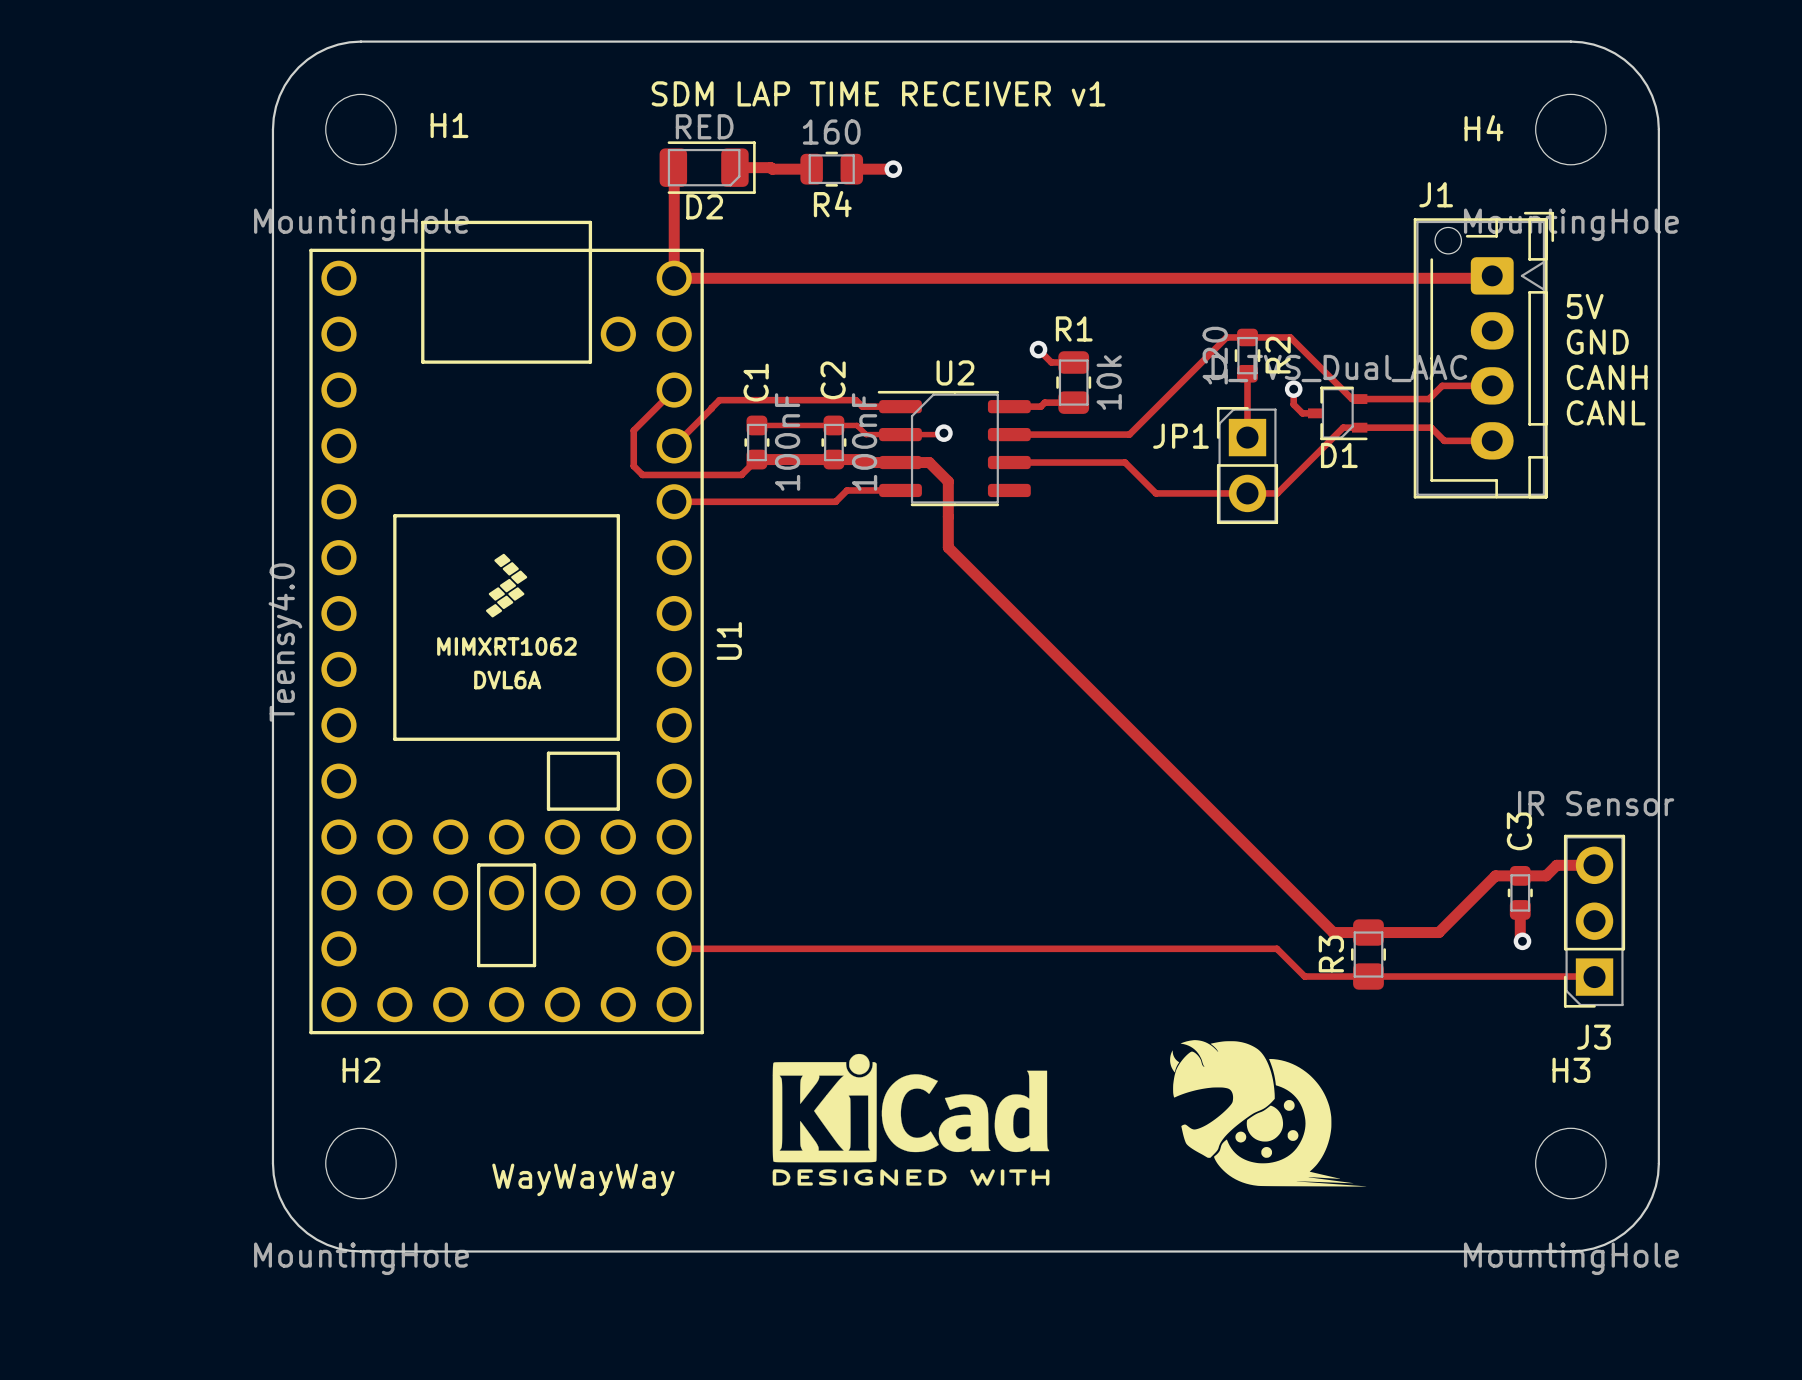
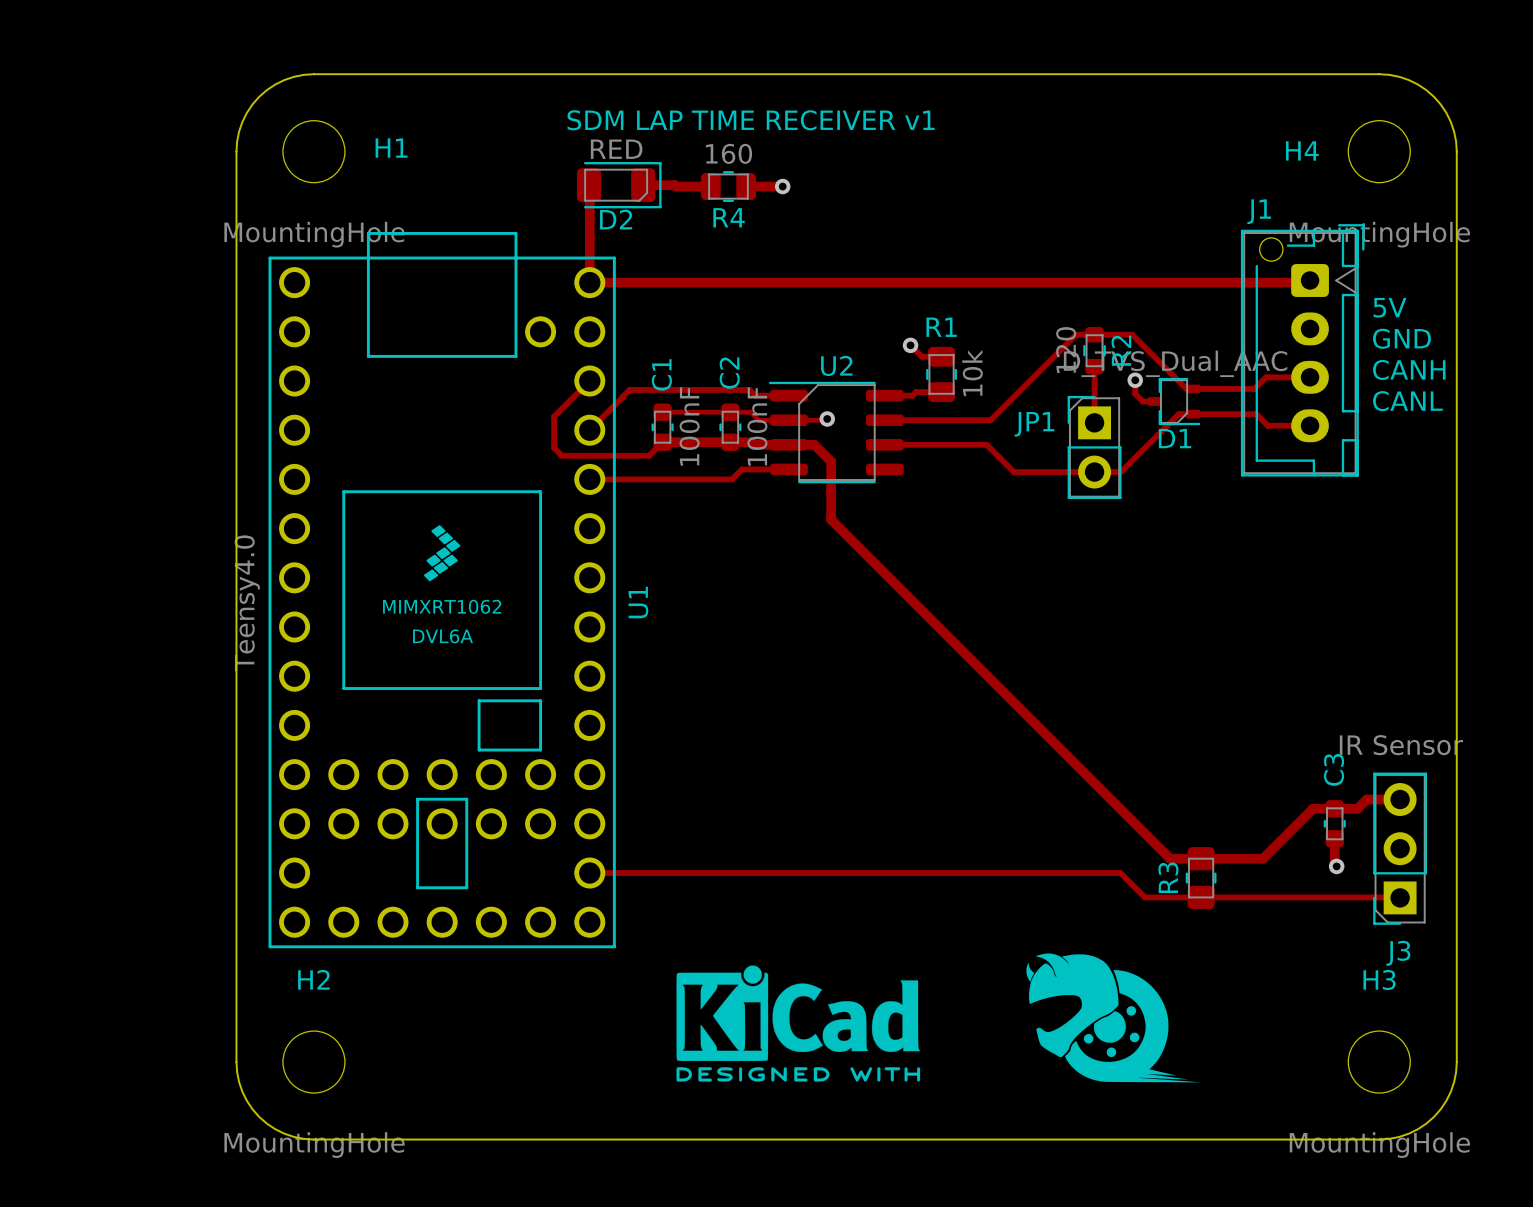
text: WayWayWay (583, 1179) -> none

